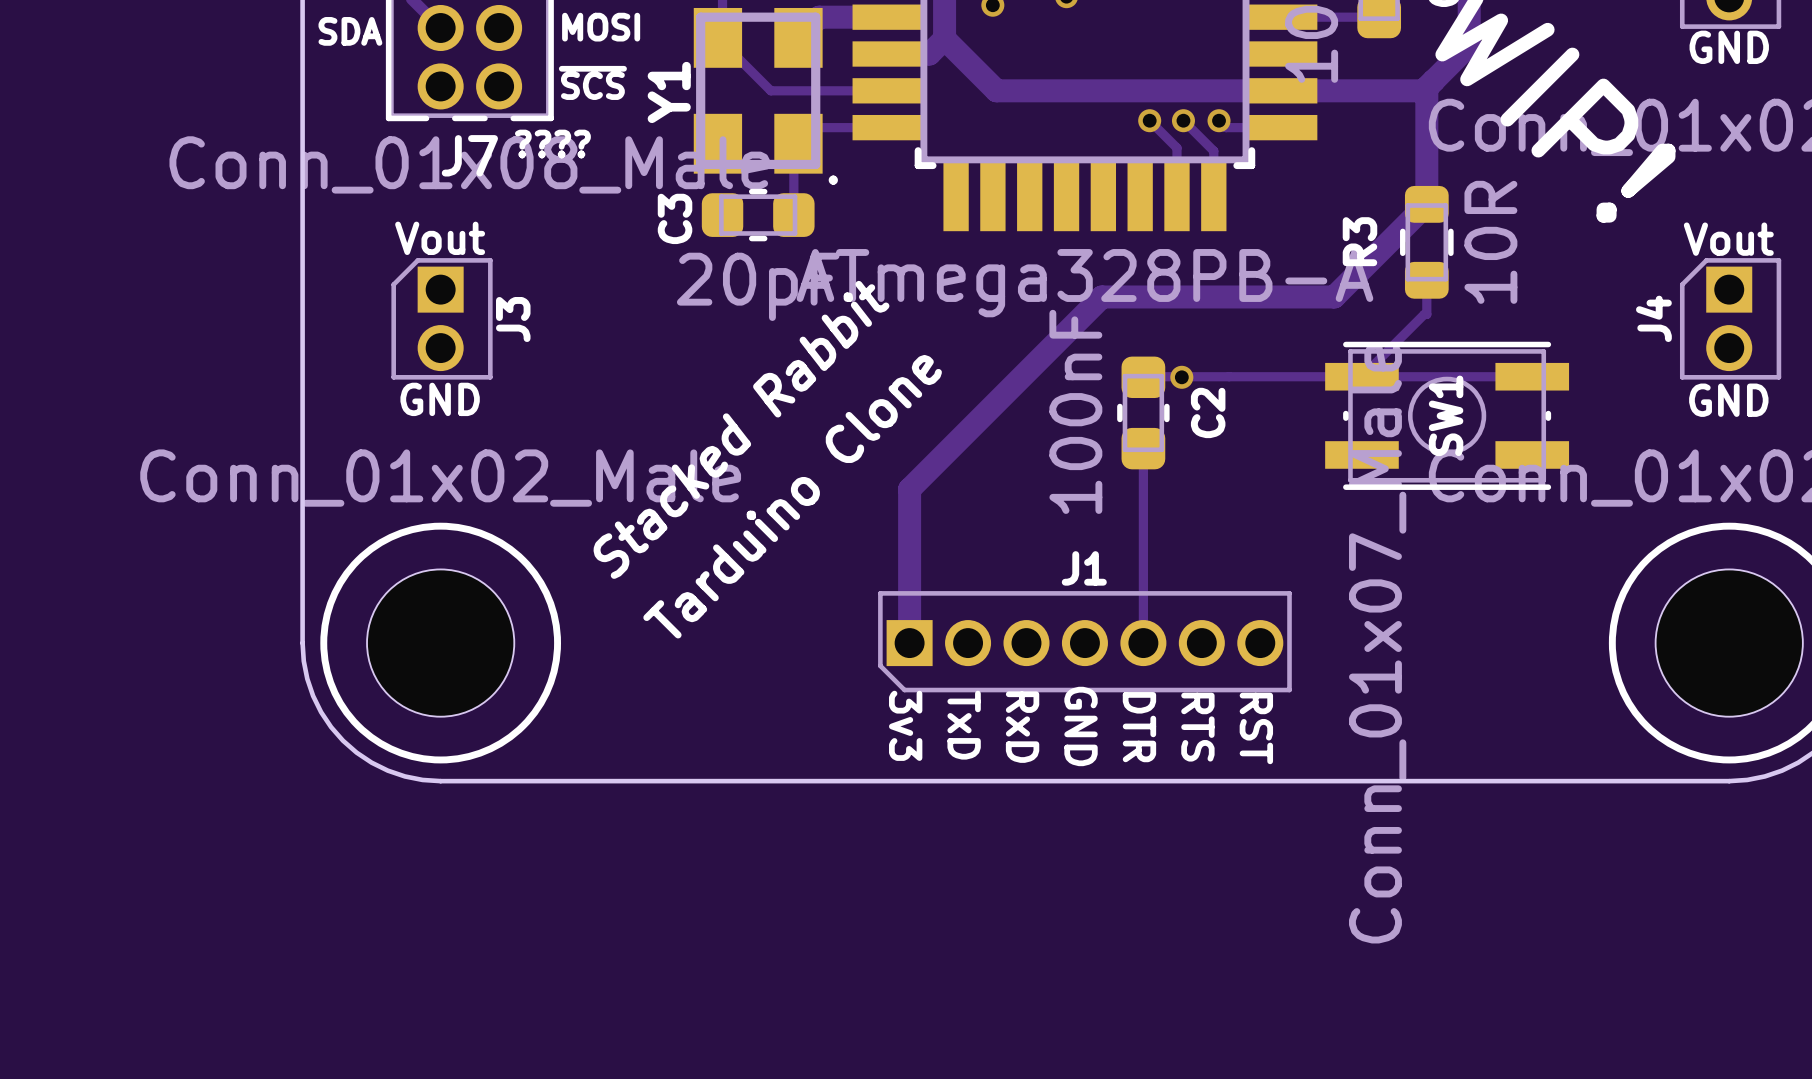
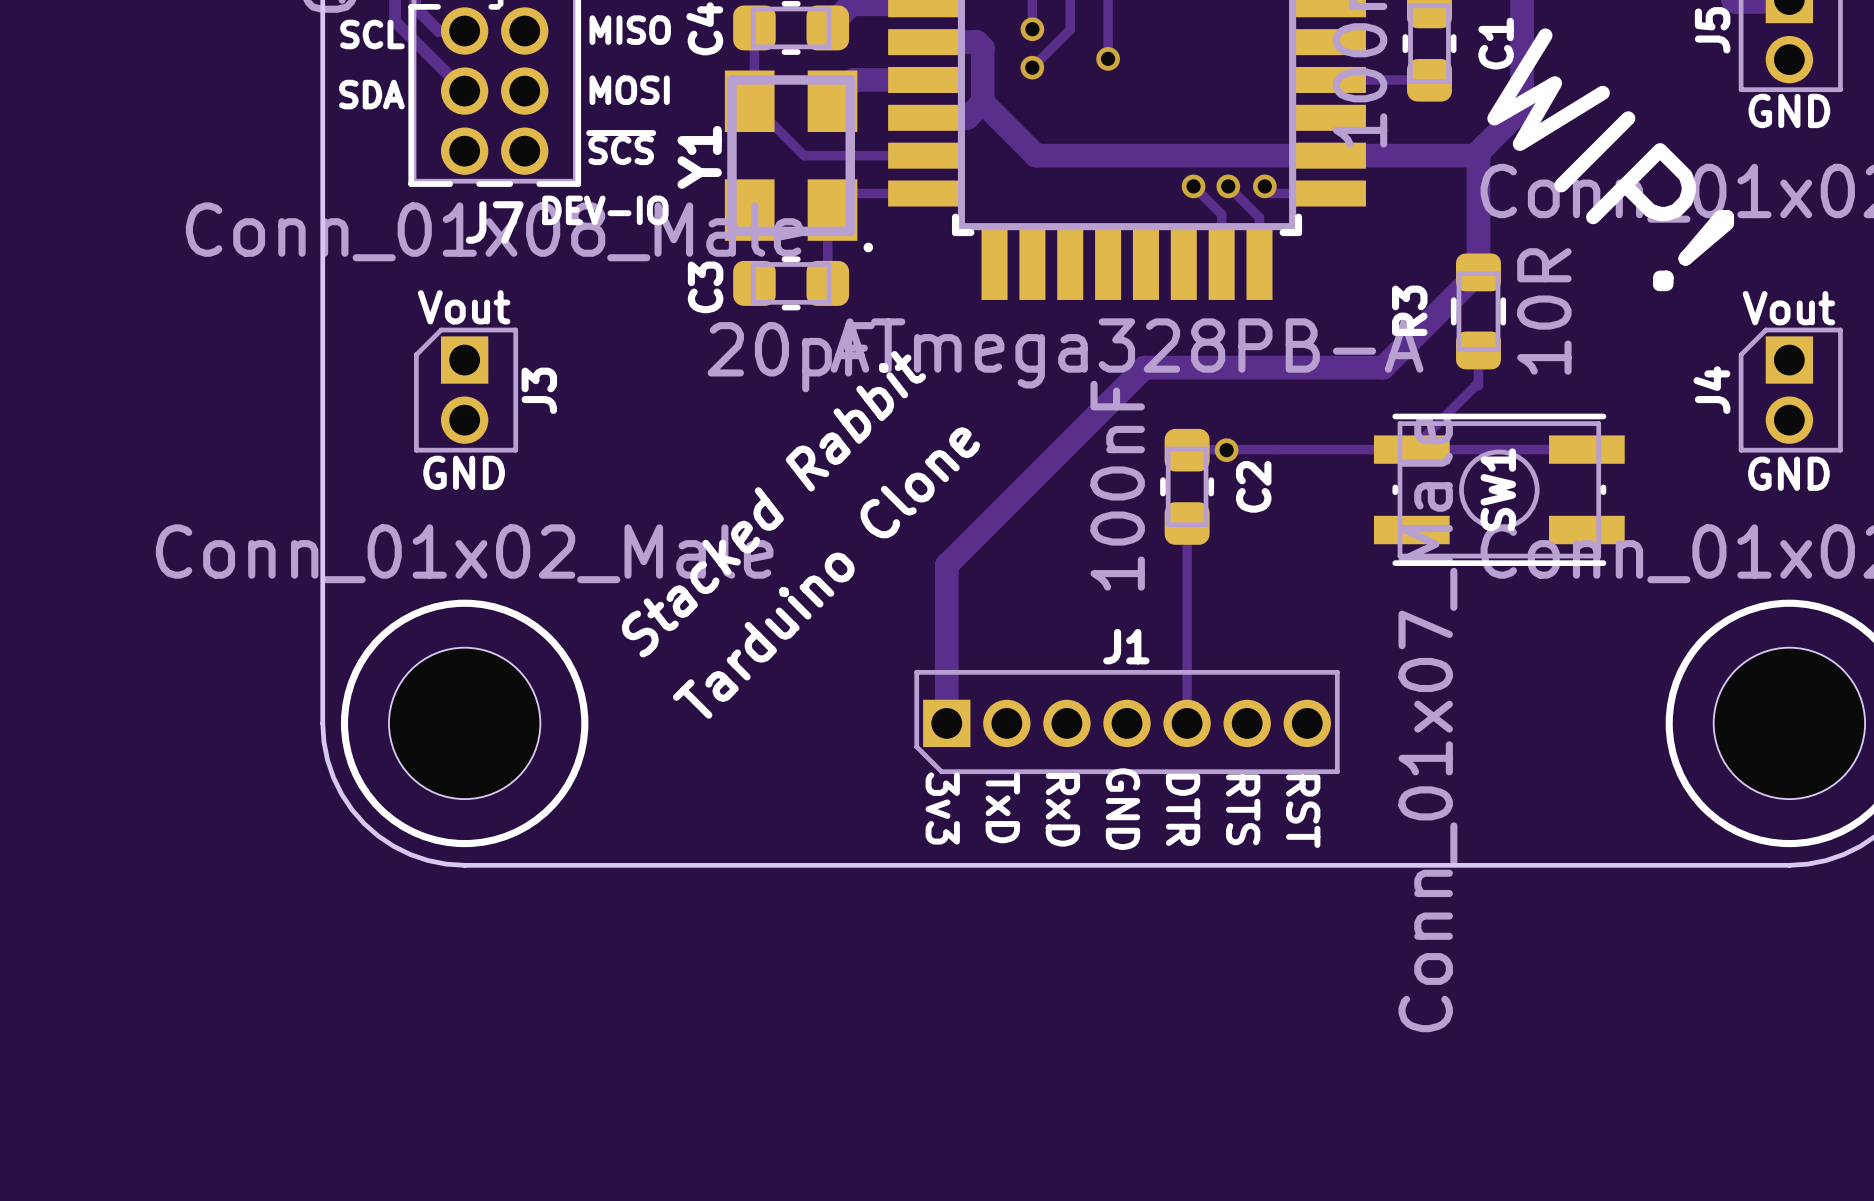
text: ???? (552, 144) -> DEV-IO (605, 210)

